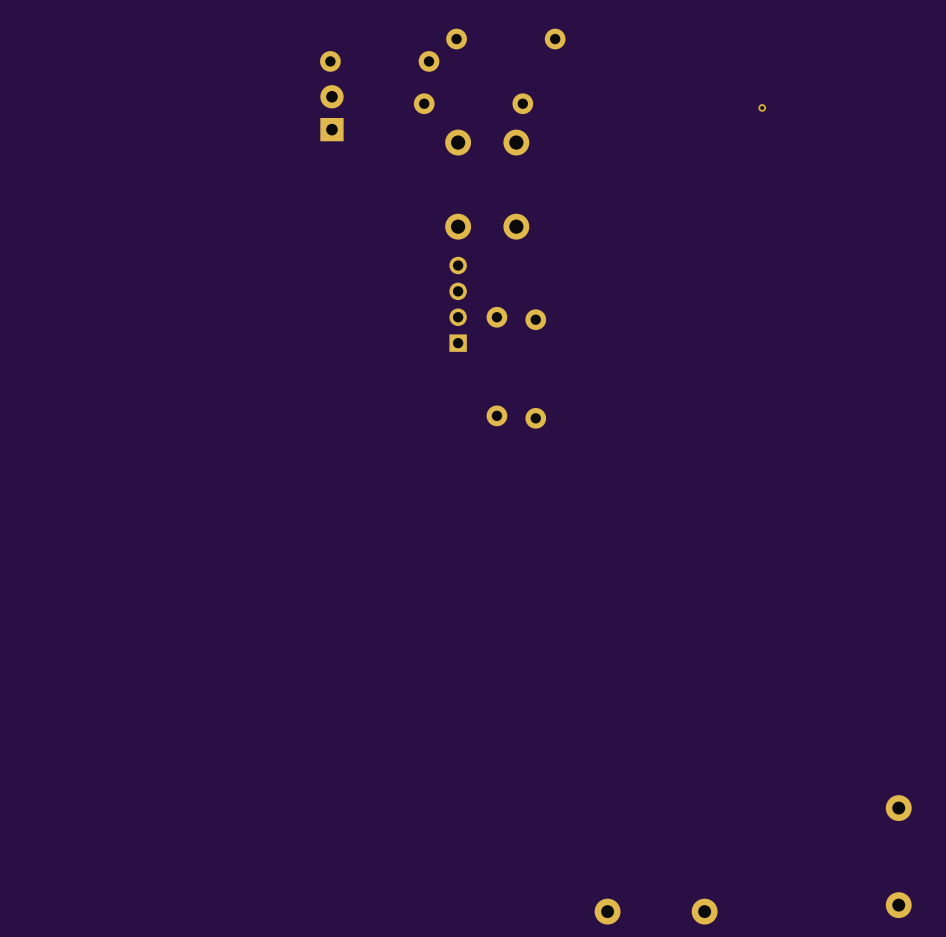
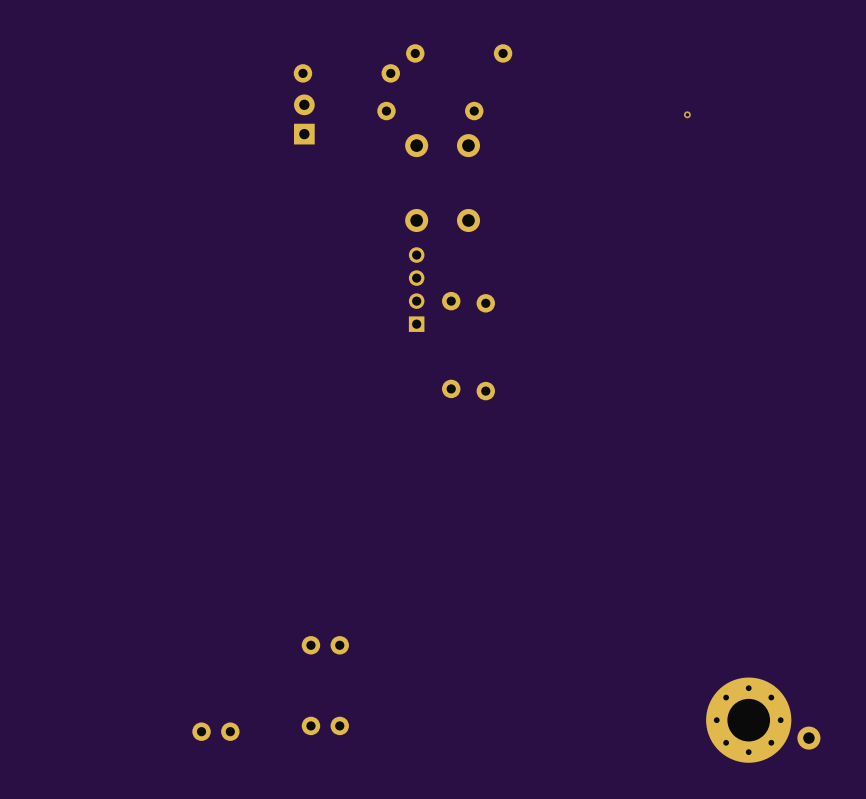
part: none -> (325, 645)
part: none -> (748, 720)
part: none -> (325, 725)
part: none -> (215, 731)

